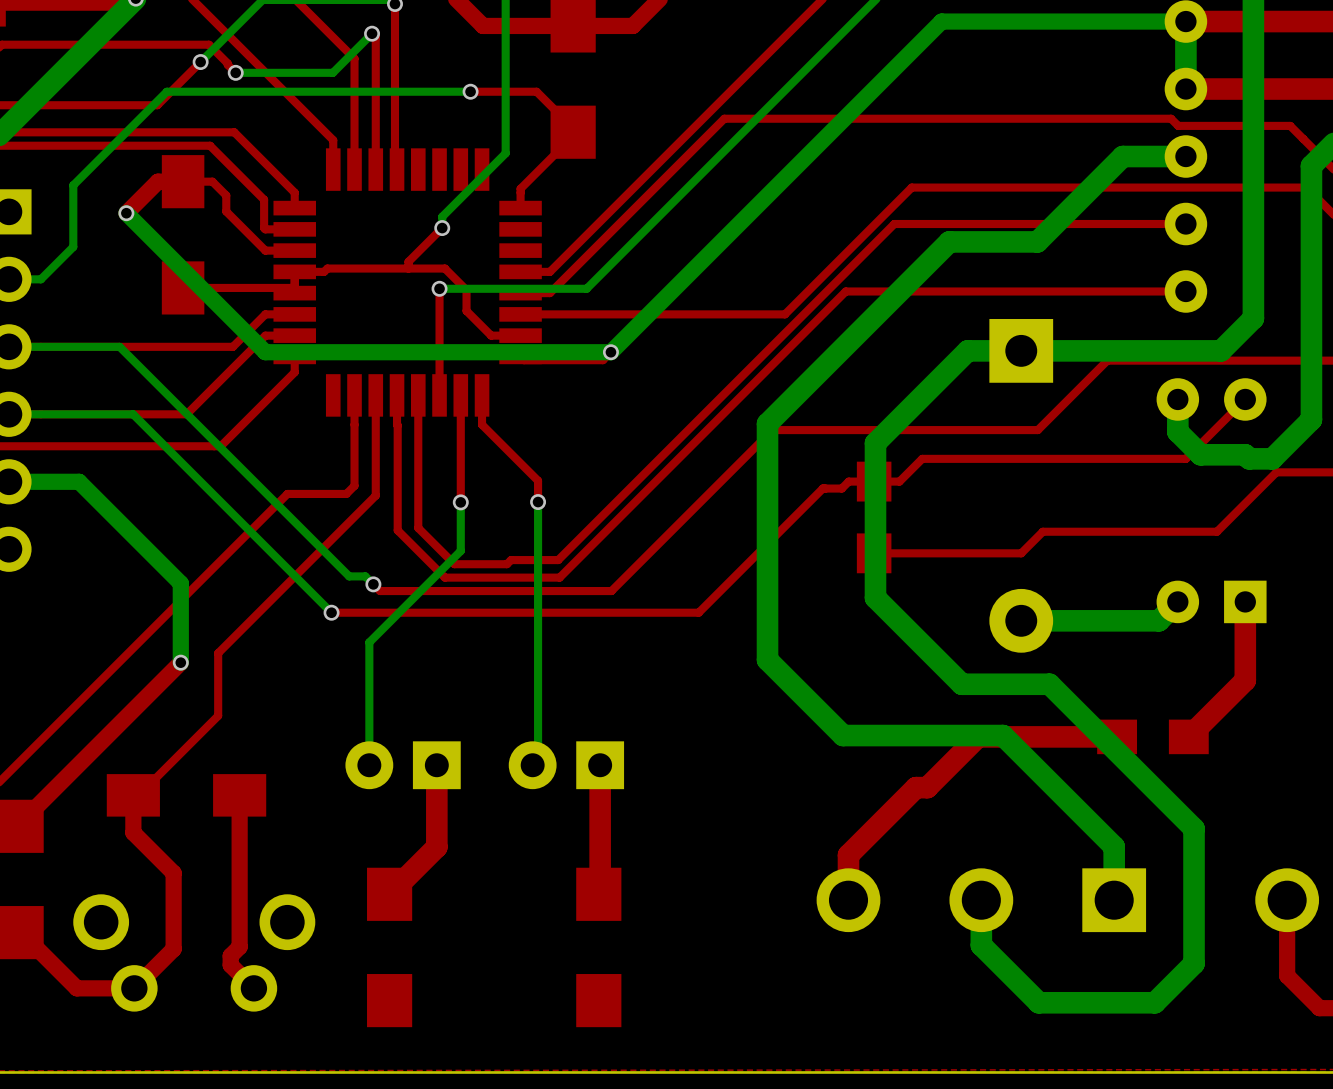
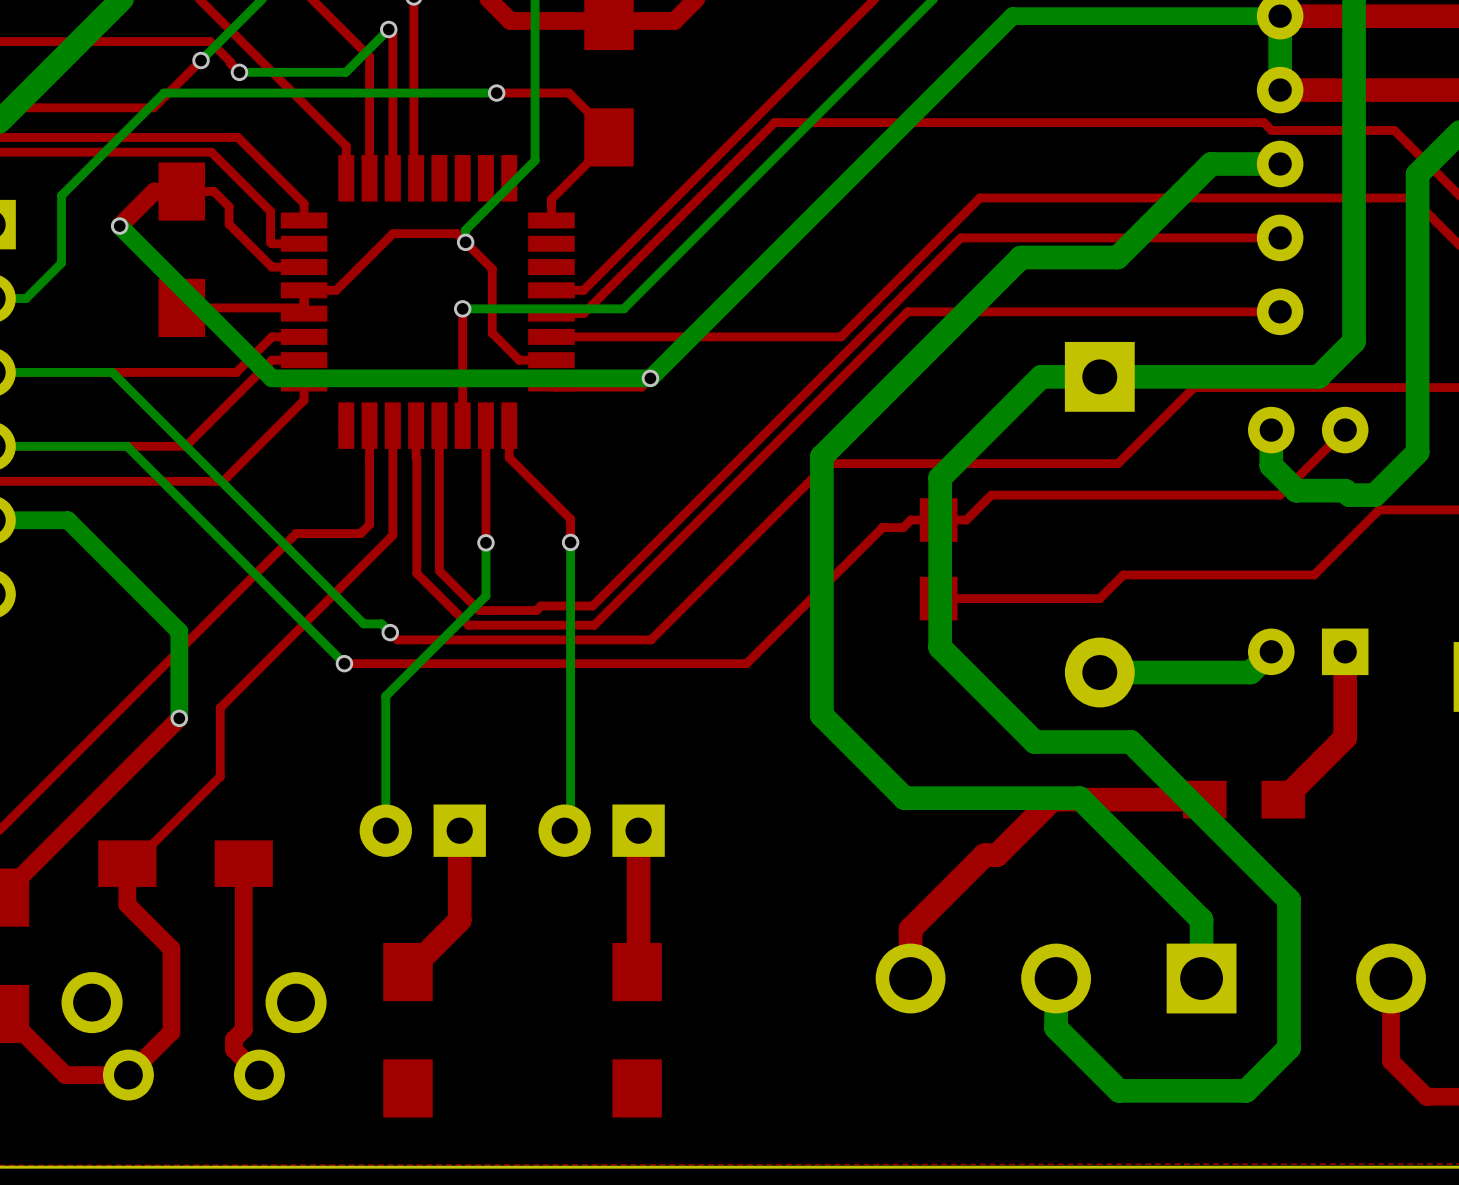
top track: (442, 228) (408, 261) (408, 268) -> none
top track: (327, 268) (444, 268) (466, 290) -> (339, 286) (392, 233) (456, 233) (492, 268) (492, 310)

